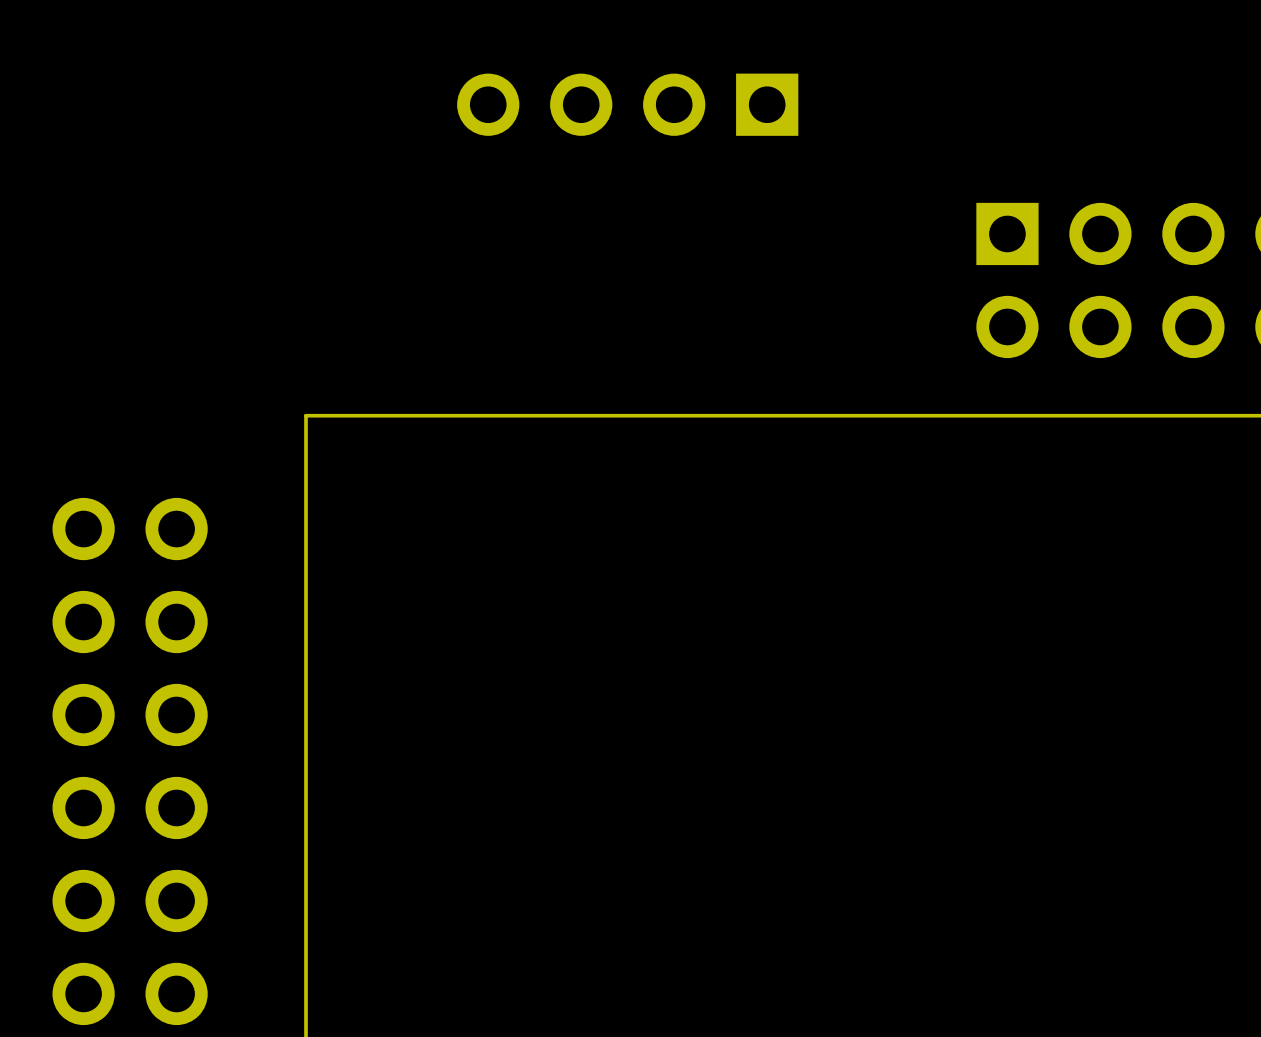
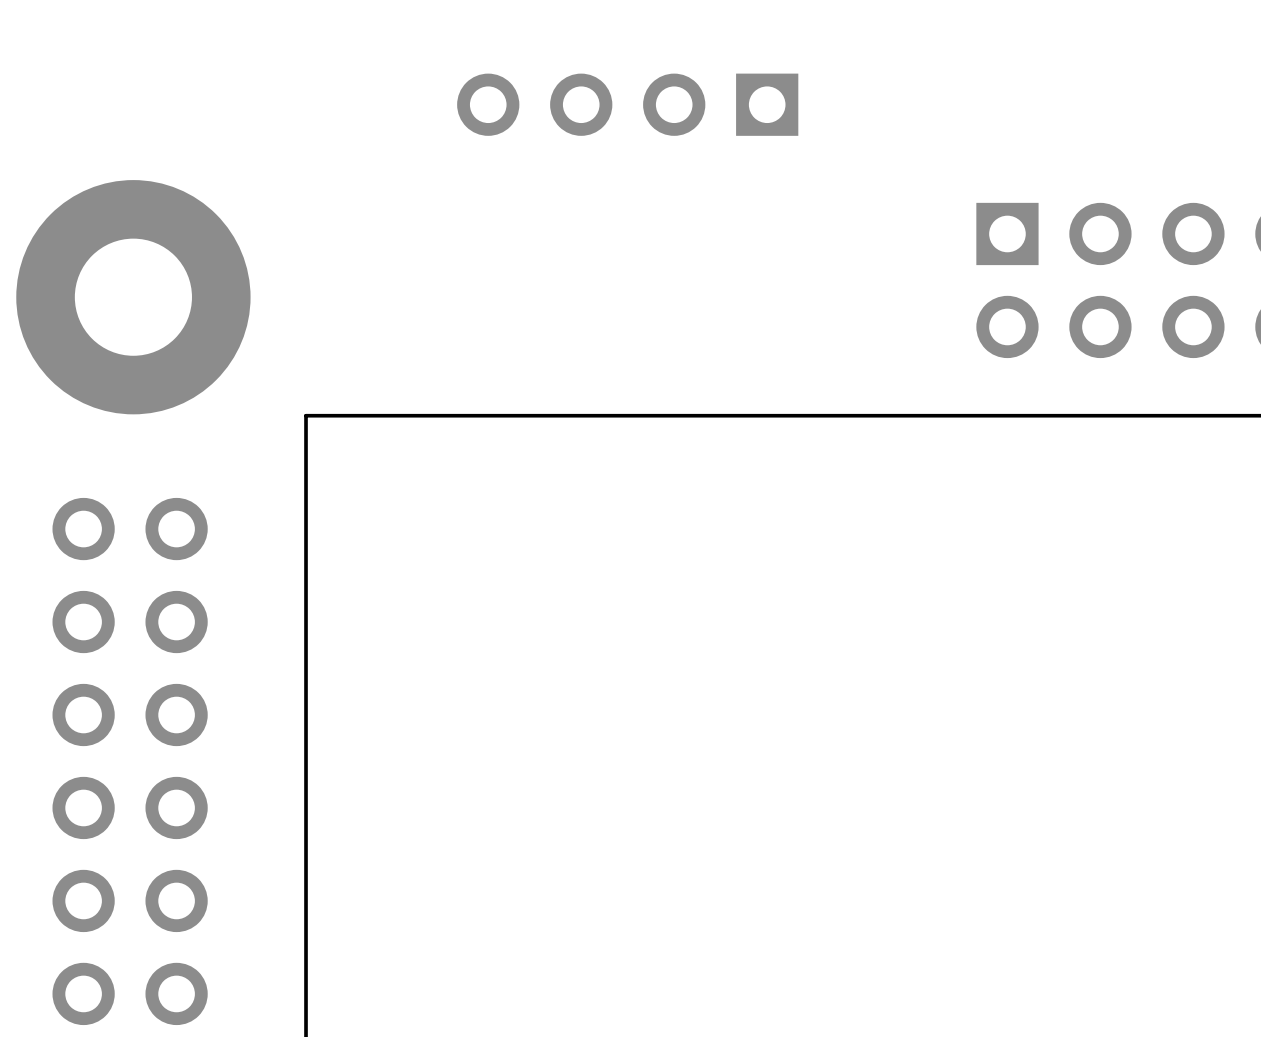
part: none -> (133, 297)

